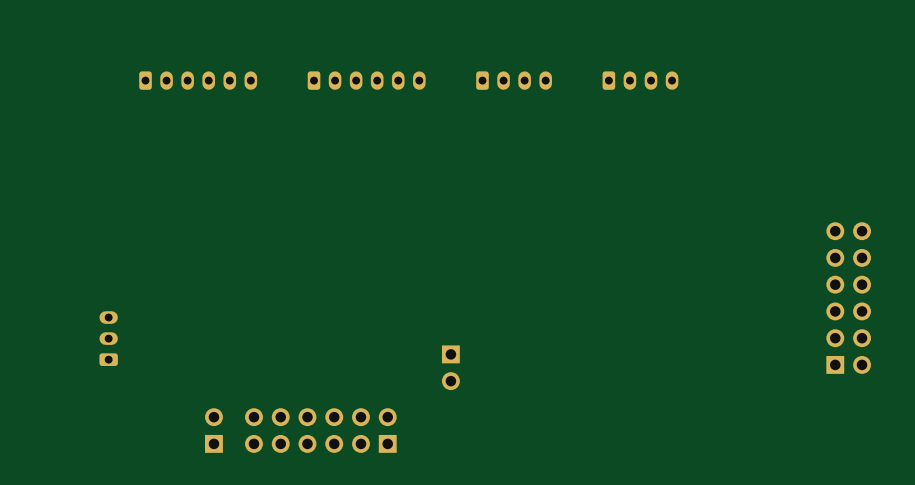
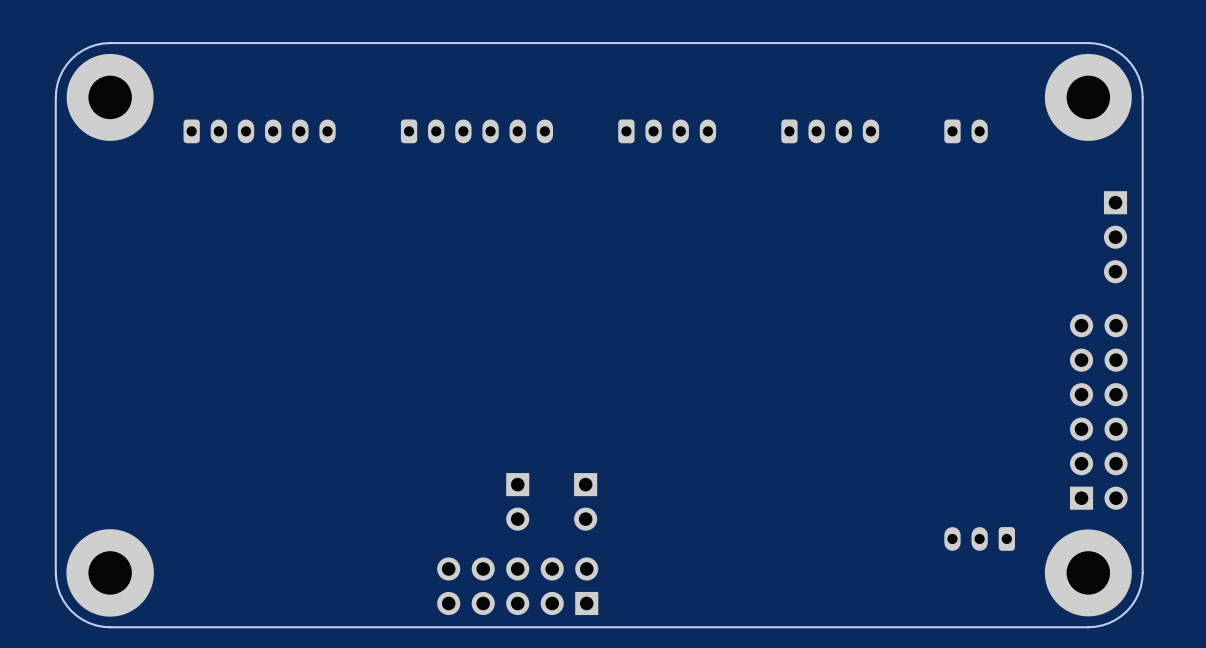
part: none -> (966, 131)
part: none -> (1115, 237)
part: none -> (599, 335)
part: (108, 338) -> none
part: none -> (979, 538)
part rotation: 0° (213, 430) -> 180° (517, 501)
part position: (213, 430) -> (517, 501)
part: (320, 430) -> none
part: none -> (517, 586)

